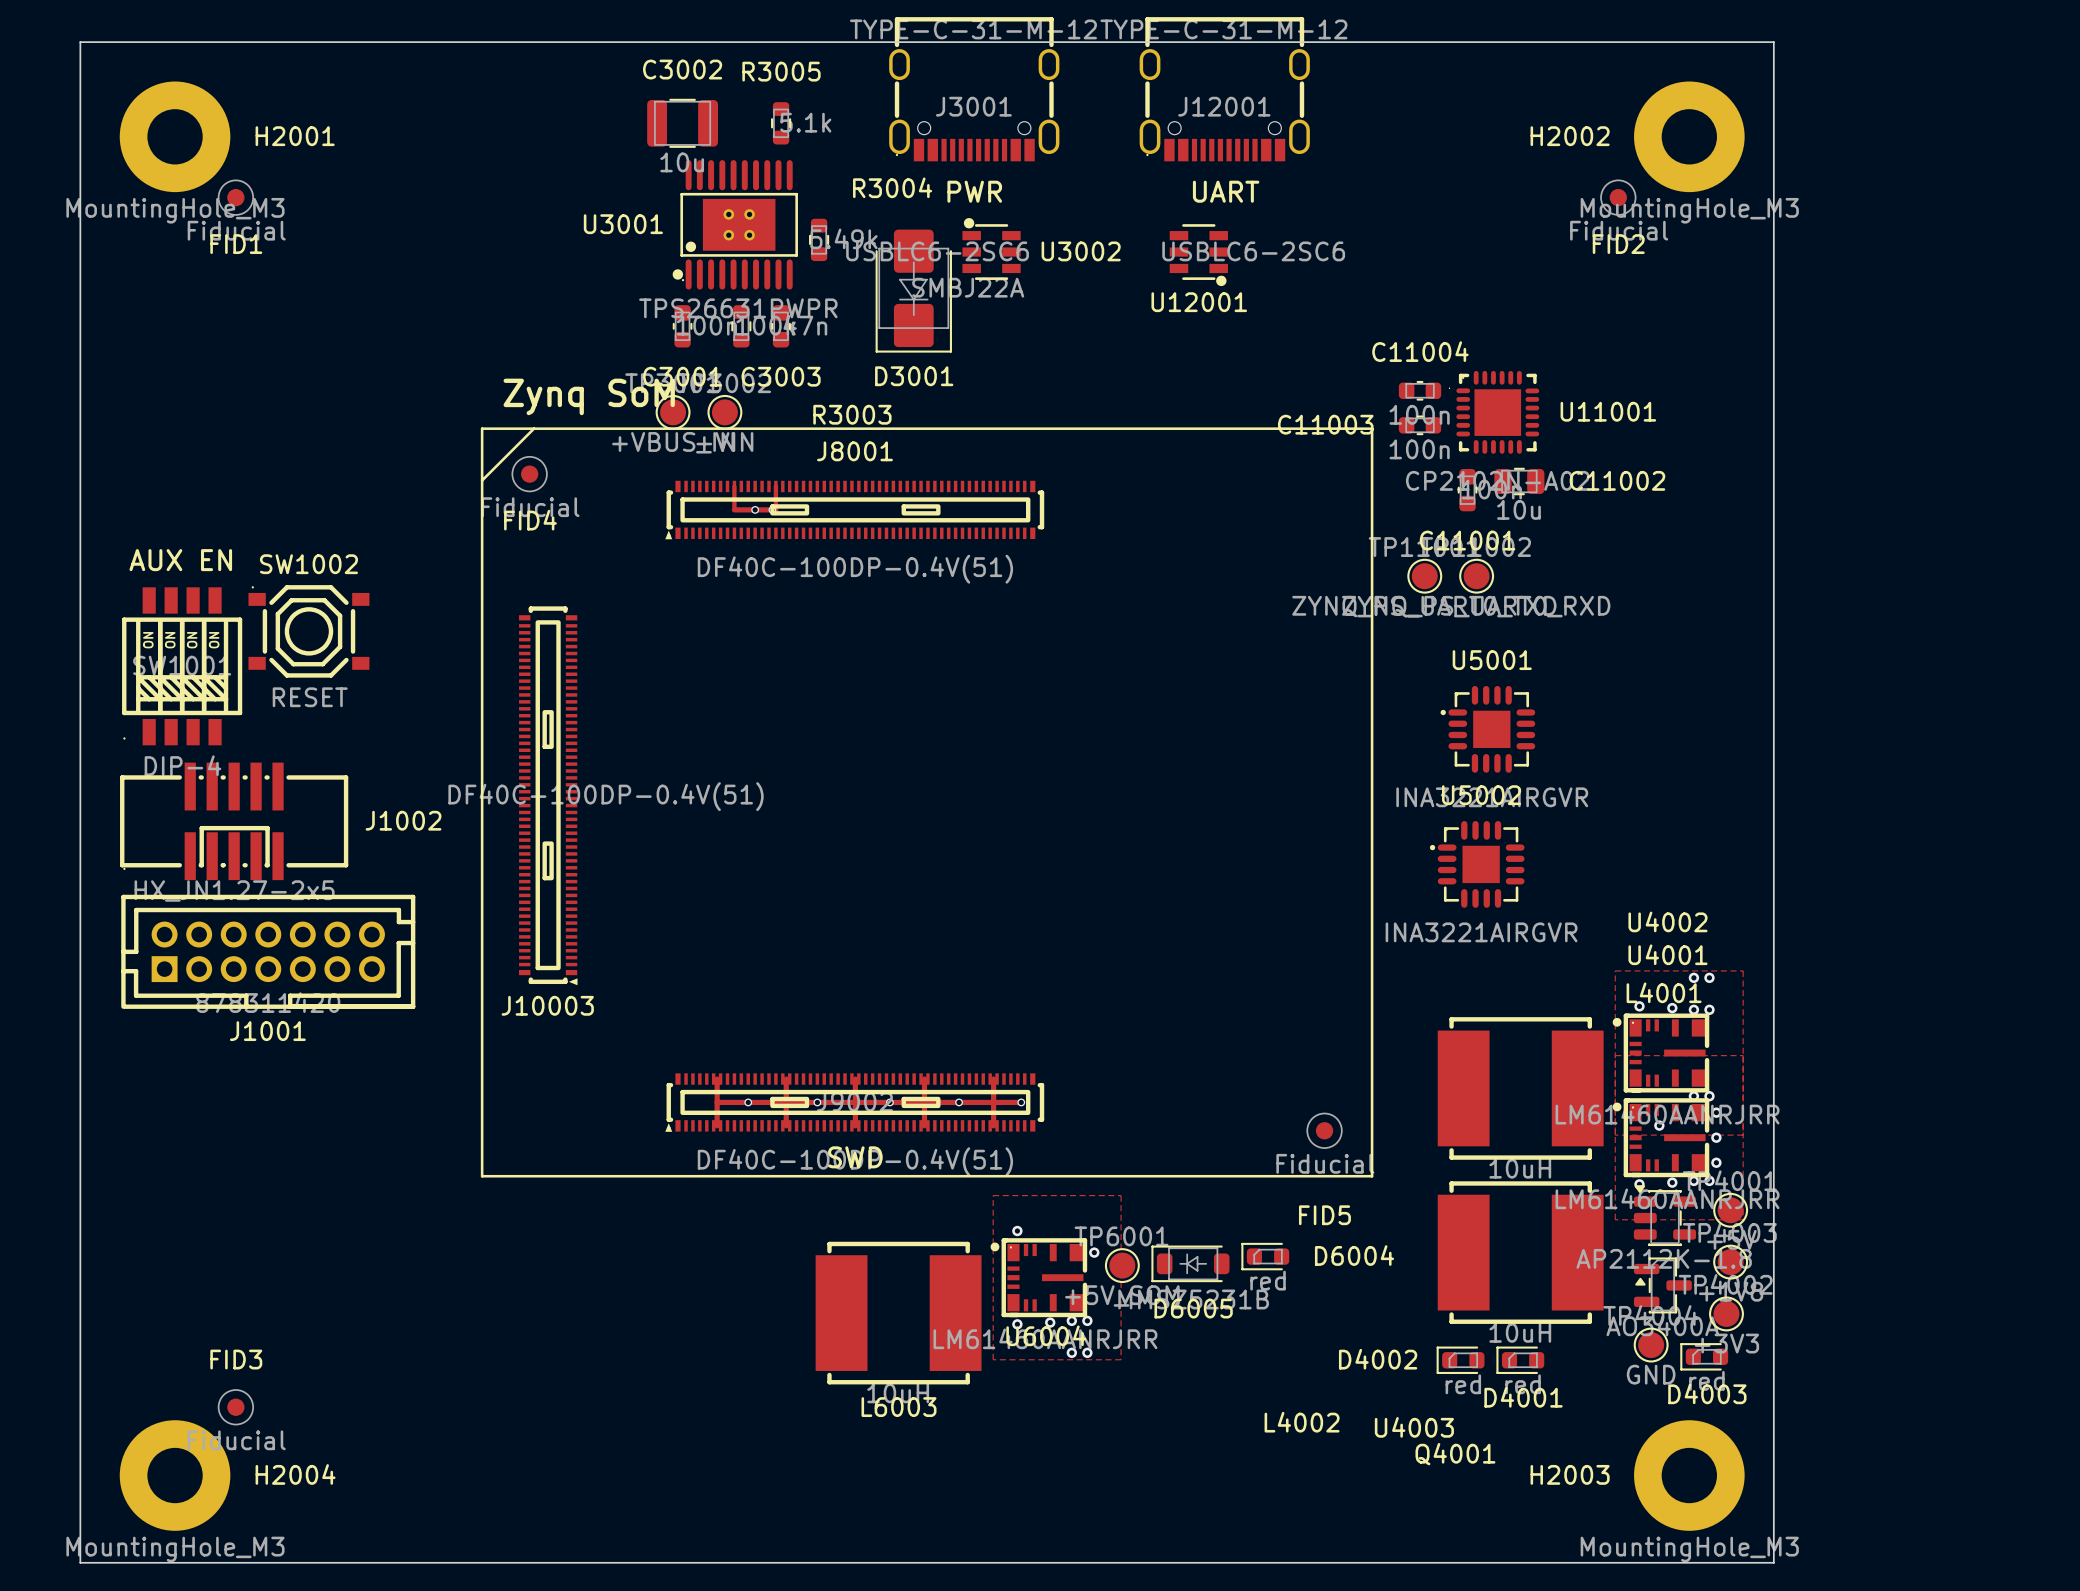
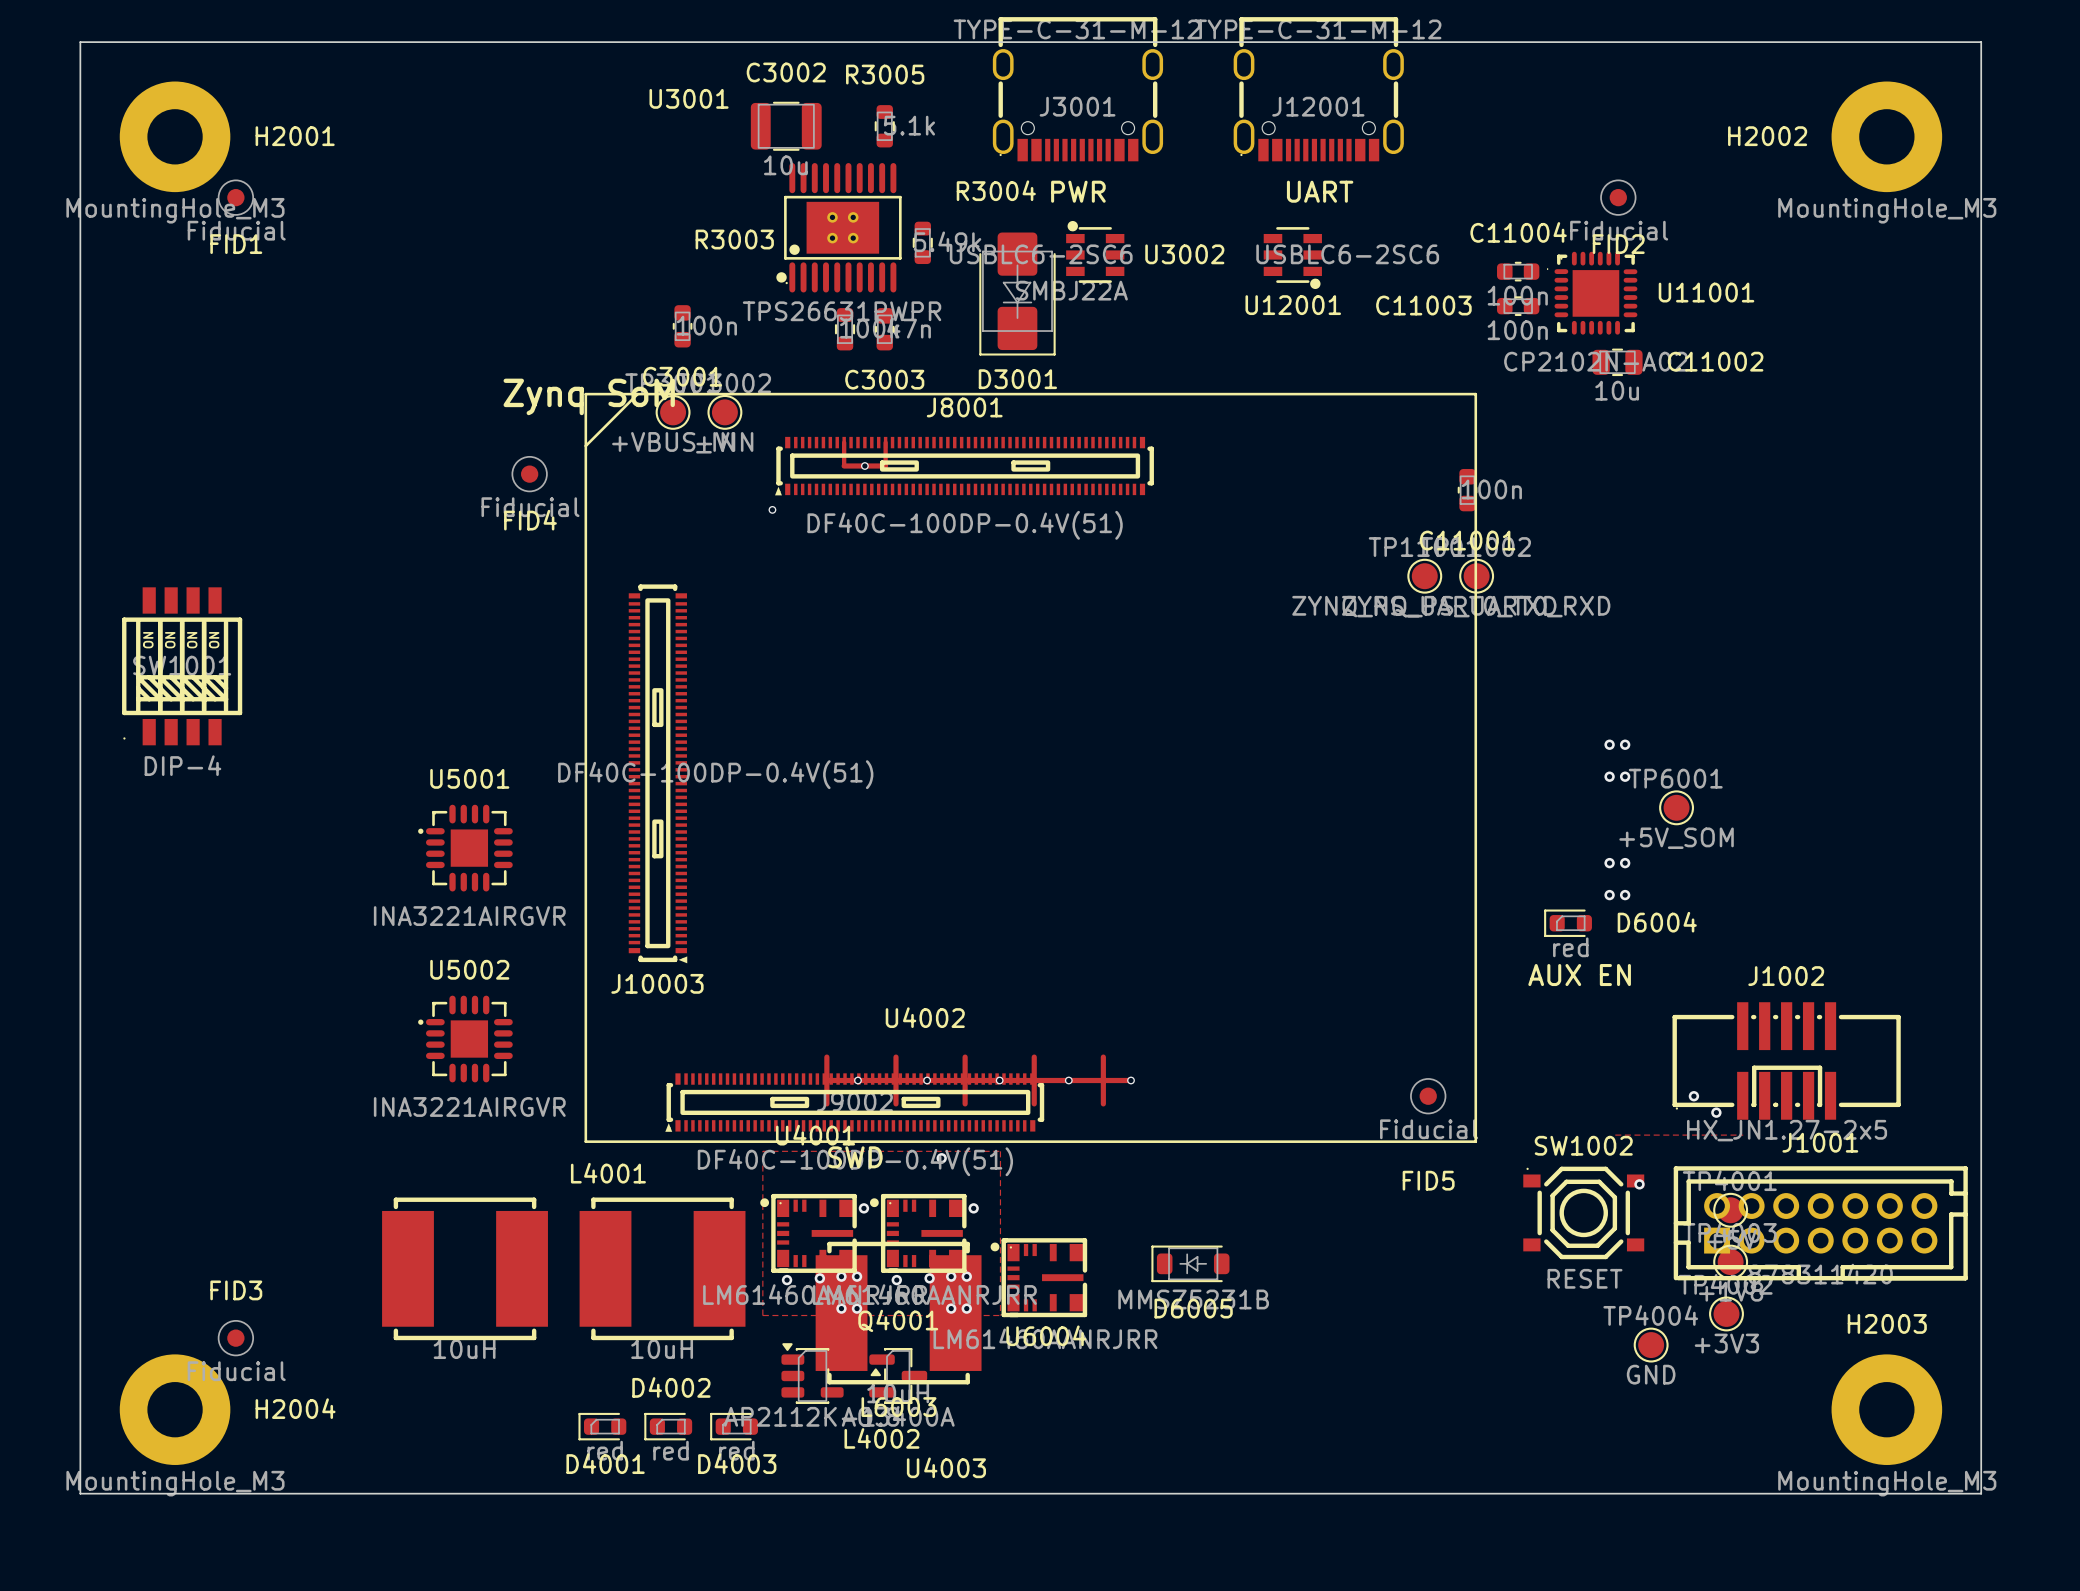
board edge: (1773, 42) (1773, 1562) (80, 1562) (80, 1493) -> (1773, 42) (1981, 42) (1981, 1493) (80, 1493)
J3001 position: (974, 89) -> (1077, 89)
J12001 position: (1224, 89) -> (1318, 89)
C3002 position: (682, 123) -> (786, 126)
R3005 position: (781, 123) -> (884, 126)
H2002 position: (1689, 136) -> (1886, 136)
text position: PWR (974, 191) -> PWR (1078, 191)
text position: UART (1226, 191) -> UART (1320, 191)
U3001 name position: U3001 (623, 224) -> U3001 (689, 98)
U3001 position: (735, 224) -> (839, 227)
R3004 position: (819, 239) -> (922, 242)
U3002 position: (991, 249) -> (1095, 251)
U12001 position: (1198, 255) -> (1292, 258)
D3001 position: (913, 291) -> (1017, 294)
R3003 position: (741, 326) -> (845, 329)
C3003 position: (781, 326) -> (884, 329)
C11004 position: (1420, 390) -> (1518, 271)
U11001 position: (1494, 412) -> (1592, 293)
R3003 name position: R3003 (852, 414) -> R3003 (734, 239)
C11003 position: (1420, 425) -> (1518, 306)
line: (482, 428) (1372, 428) (1372, 1176) (482, 1176) (482, 428) -> (585, 394) (1475, 394) (1475, 1141) (585, 1141) (585, 394)
line: (533, 428) (482, 480) -> (637, 394) (585, 445)
via: none -> (864, 466)
C11002 position: (1519, 481) -> (1617, 362)
track: (734, 486) (734, 509) (775, 509) (775, 486) -> (844, 442) (844, 466) (885, 466) (885, 442)
via: (755, 509) -> none
J8001 position: (854, 510) -> (964, 466)
text: AUX EN (180, 560) -> none
SW1002 position: (308, 631) -> (1583, 1212)
U5001 position: (1487, 729) -> (465, 848)
via: none -> (1609, 744)
via: none -> (1625, 744)
via: none -> (1609, 776)
via: none -> (1625, 776)
J10003 position: (548, 795) -> (657, 773)
J1002 name position: J1002 (403, 820) -> J1002 (1786, 976)
J1002 position: (234, 821) -> (1786, 1060)
via: none -> (1609, 863)
via: none -> (1625, 863)
U5002 position: (1477, 864) -> (465, 1039)
via: none -> (1609, 895)
via: none -> (1625, 895)
J1001 position: (268, 951) -> (1820, 1223)
zone outline: (1615, 970) (1743, 970) (1743, 1219) (1615, 1219) (1615, 970) -> none
text: none -> AUX EN (1579, 975)
via: (1693, 977) -> none
via: (1709, 977) -> none
via: (1639, 1006) -> none
via: (1672, 1008) -> none
via: (1693, 1009) -> none
via: (1709, 1009) -> none
J1001 name position: J1001 (267, 1031) -> J1001 (1820, 1142)
U4001 position: (1660, 1053) -> (808, 1233)
zone outline: (1615, 1055) (1743, 1055) -> none
track: (717, 1079) (717, 1125) -> (826, 1057) (826, 1103)
track: (786, 1079) (786, 1125) -> (895, 1057) (895, 1103)
track: (855, 1079) (855, 1125) -> (965, 1057) (965, 1103)
track: (924, 1079) (924, 1125) -> (1034, 1057) (1034, 1103)
track: (993, 1079) (993, 1125) -> (1103, 1057) (1103, 1103)
via: none -> (857, 1080)
via: none -> (927, 1080)
via: none -> (999, 1080)
via: none -> (1068, 1080)
via: none -> (1131, 1080)
L4001 position: (1520, 1088) -> (465, 1268)
via: (1709, 1096) -> none
track: (717, 1102) (1021, 1102) -> (826, 1080) (1131, 1080)
via: (748, 1102) -> none
via: (817, 1102) -> none
via: (889, 1102) -> none
via: (959, 1102) -> none
via: (1021, 1102) -> none
via: (1659, 1125) -> none
FID5 position: (1324, 1130) -> (1428, 1096)
U4002 position: (1660, 1137) -> (918, 1233)
via: (1716, 1137) -> none
zone outline: none -> (762, 1151) (762, 1315) (1000, 1315) (1000, 1151) (762, 1151)
via: none -> (941, 1158)
via: (1716, 1162) -> none
via: (1693, 1180) -> none
via: (1709, 1180) -> none
via: (1672, 1182) -> none
zone outline: (993, 1195) (1121, 1195) (1121, 1359) (993, 1359) (993, 1195) -> none
via: none -> (863, 1208)
via: none -> (973, 1208)
U4003 position: (1664, 1215) -> (812, 1373)
via: (1017, 1231) -> none
via: (1094, 1252) -> none
L4002 position: (1520, 1252) -> (662, 1268)
D6004 position: (1265, 1256) -> (1568, 923)
TP6001 position: (1122, 1265) -> (1676, 807)
via: none -> (841, 1276)
via: none -> (857, 1276)
via: none -> (951, 1276)
via: none -> (966, 1276)
via: none -> (819, 1278)
via: none -> (929, 1278)
via: none -> (787, 1280)
via: none -> (896, 1280)
Q4001 position: (1662, 1285) -> (898, 1375)
via: none -> (841, 1308)
via: none -> (857, 1308)
via: none -> (951, 1308)
via: none -> (966, 1308)
via: (1071, 1320) -> none
via: (1087, 1320) -> none
via: (1050, 1322) -> none
via: (1017, 1324) -> none
via: (1071, 1352) -> none
via: (1087, 1352) -> none
D4003 position: (1704, 1356) -> (734, 1426)
D4002 name position: D4002 (1378, 1359) -> D4002 (671, 1387)
D4002 position: (1460, 1360) -> (668, 1426)
D4001 position: (1520, 1360) -> (602, 1426)
FID3 position: (235, 1407) -> (235, 1338)
L4002 name position: L4002 (1302, 1422) -> L4002 (881, 1438)
U4003 name position: U4003 (1414, 1427) -> U4003 (946, 1467)
Q4001 name position: Q4001 (1455, 1454) -> Q4001 (898, 1320)
H2003 name position: H2003 (1570, 1474) -> H2003 (1887, 1323)
H2004 position: (175, 1475) -> (175, 1409)
H2003 position: (1689, 1475) -> (1886, 1409)

